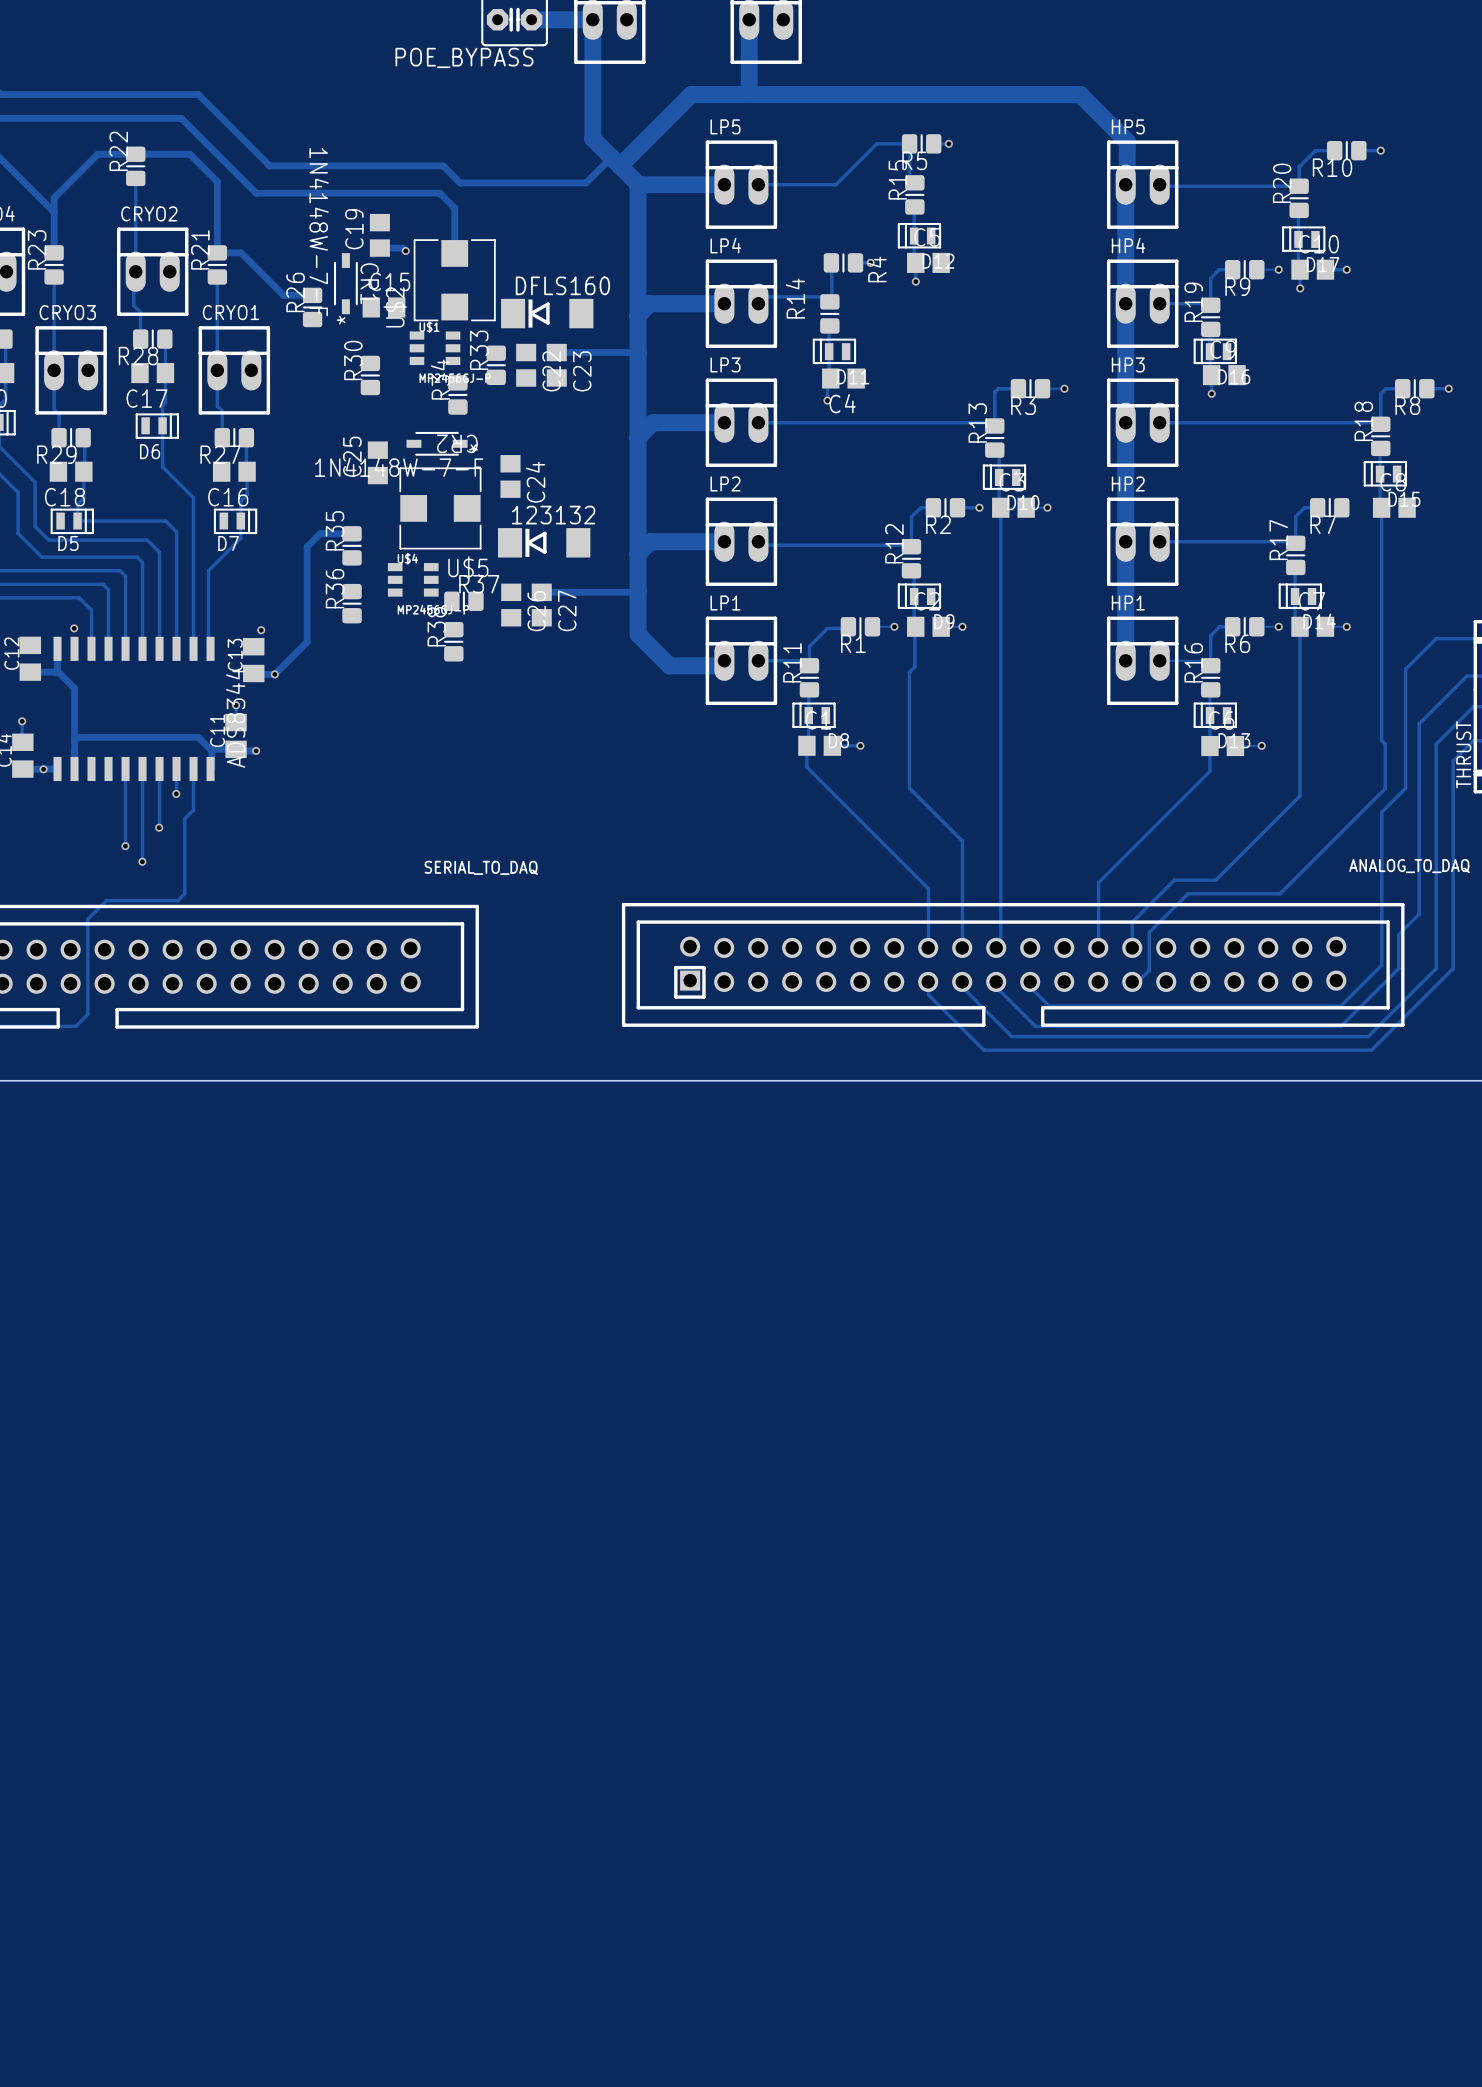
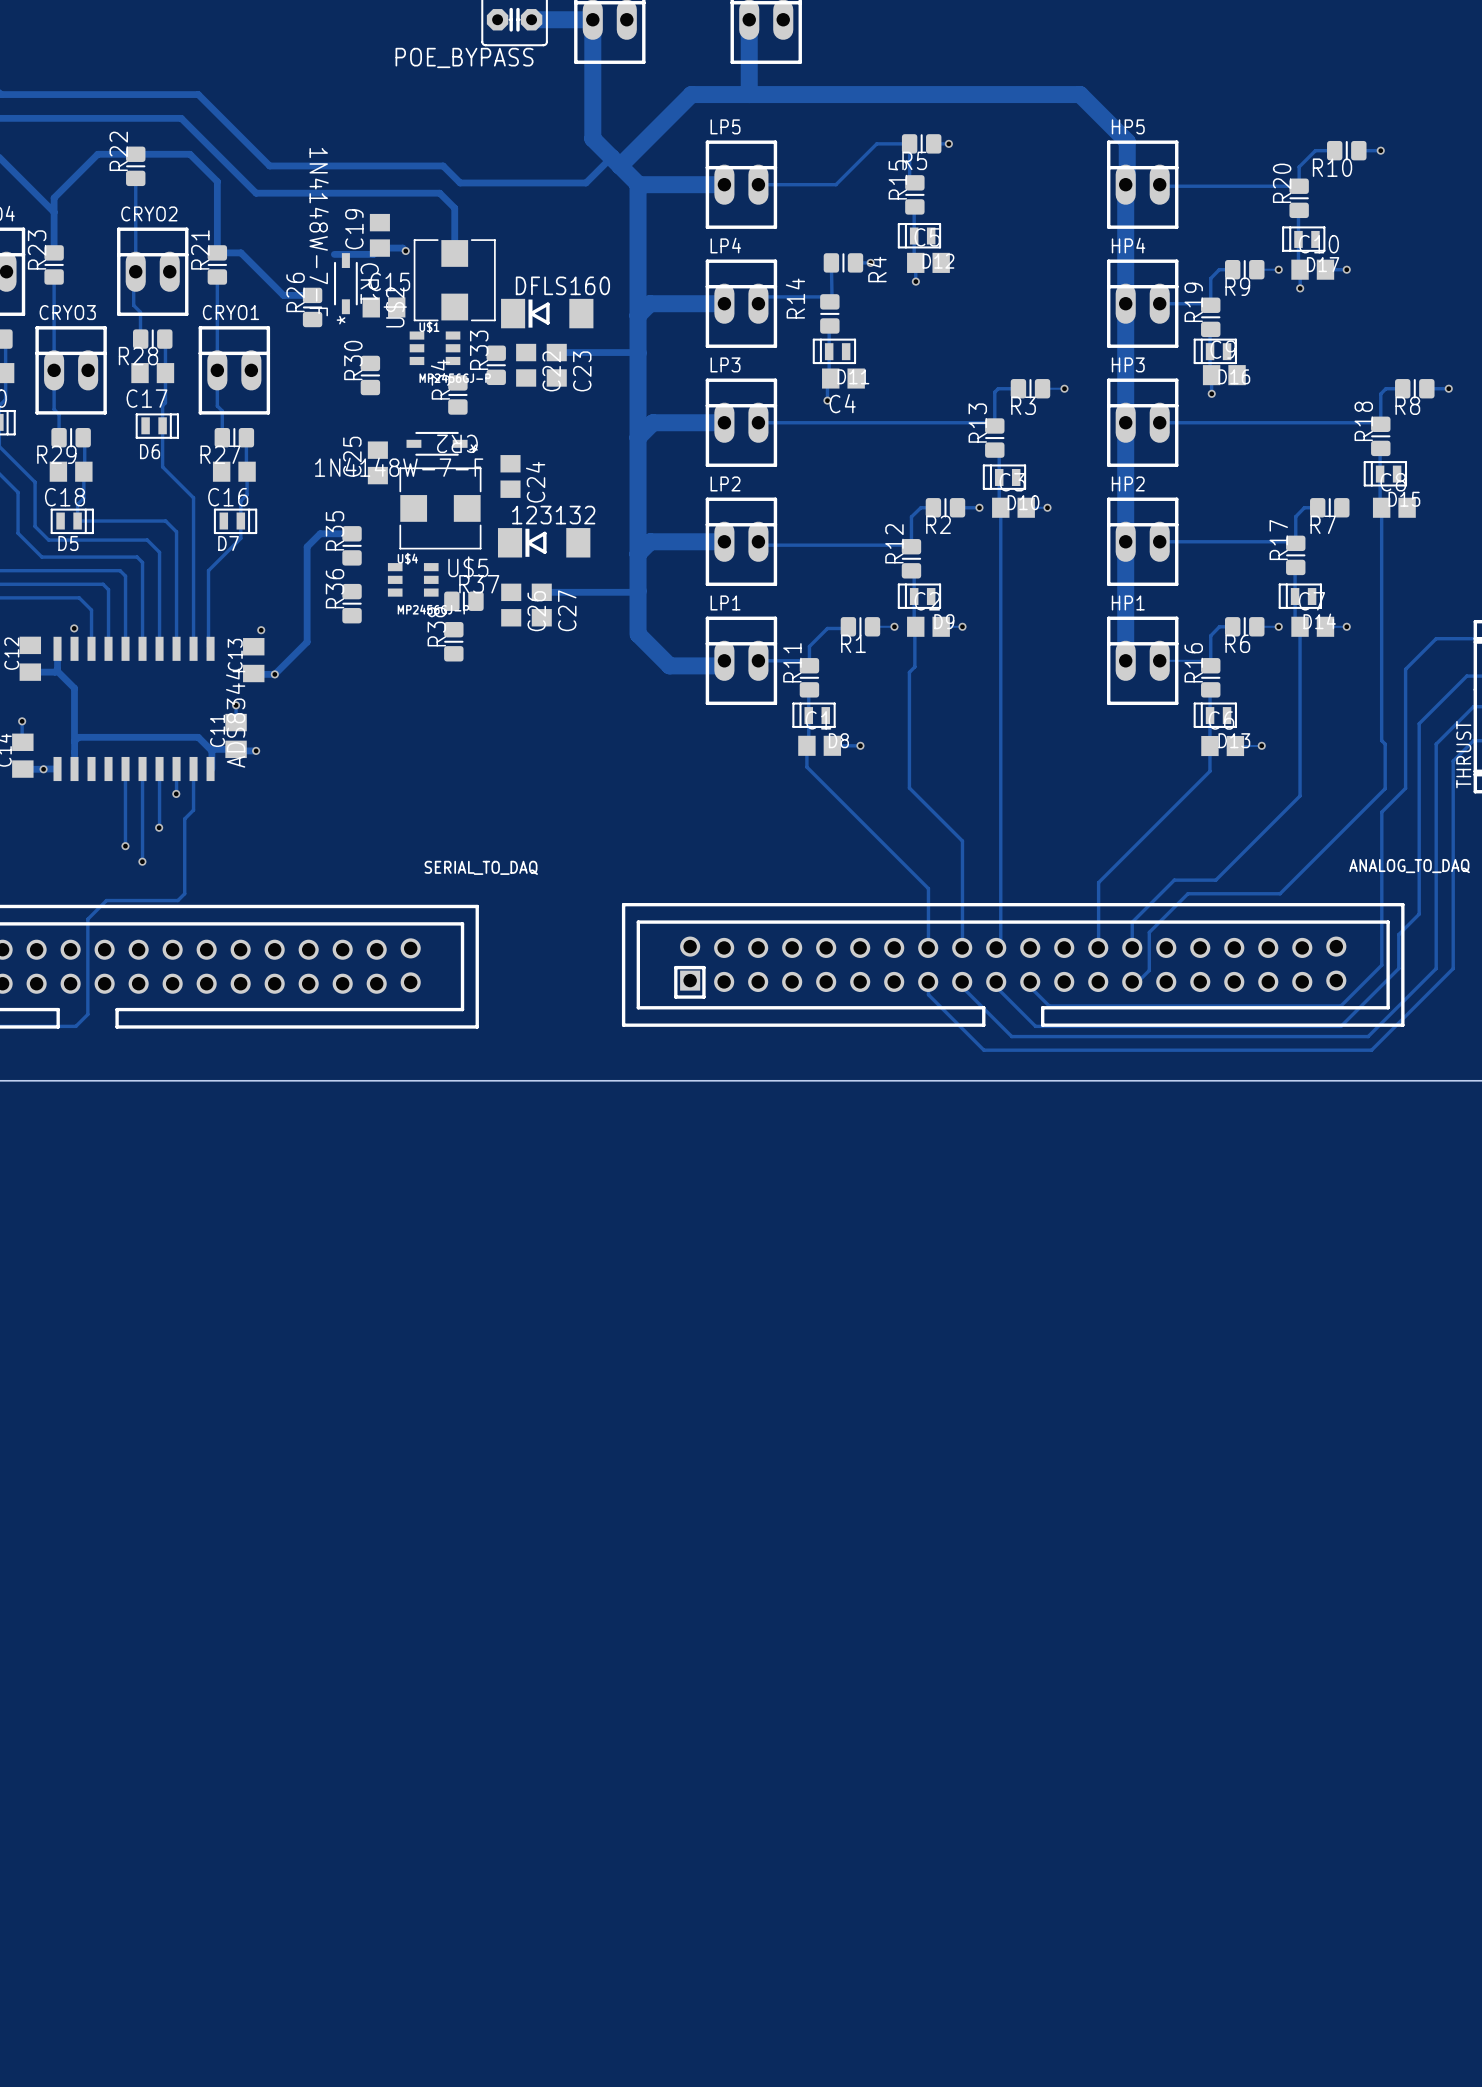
track: none -> (334, 254) (373, 254)

